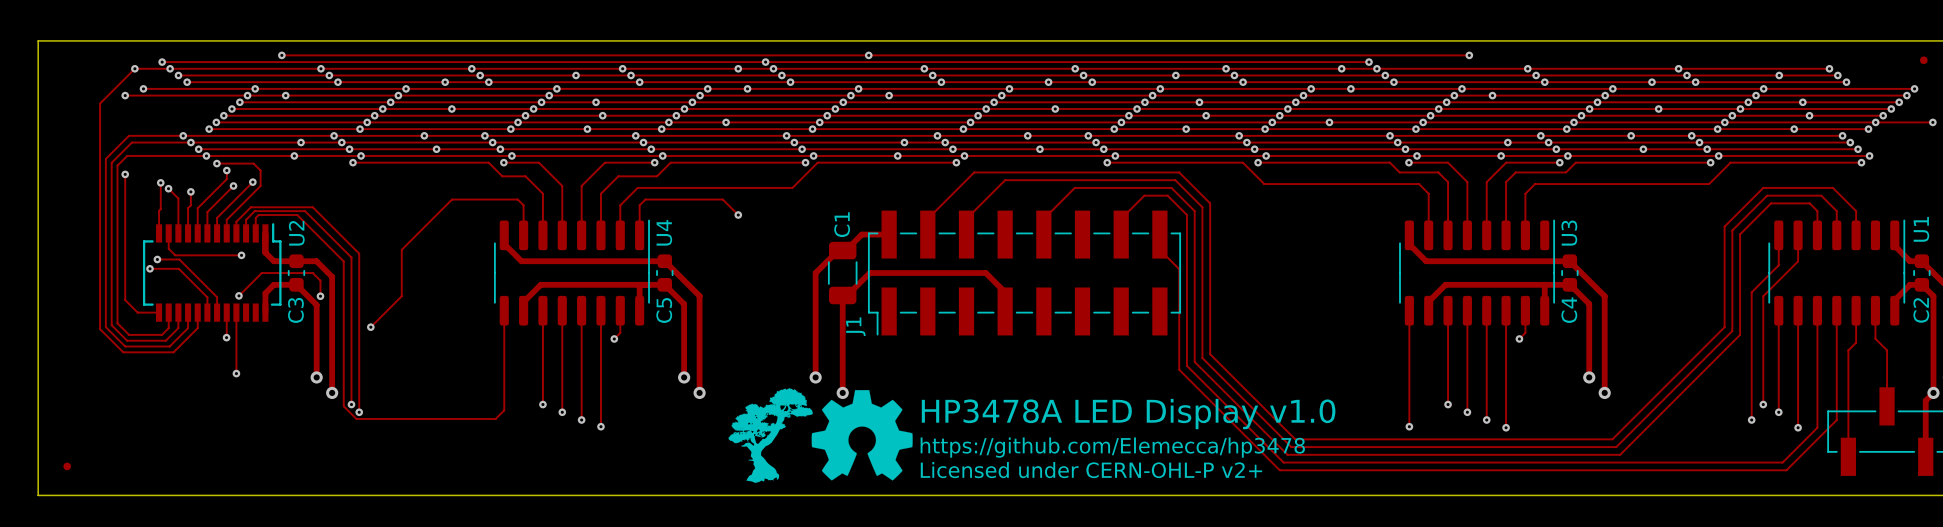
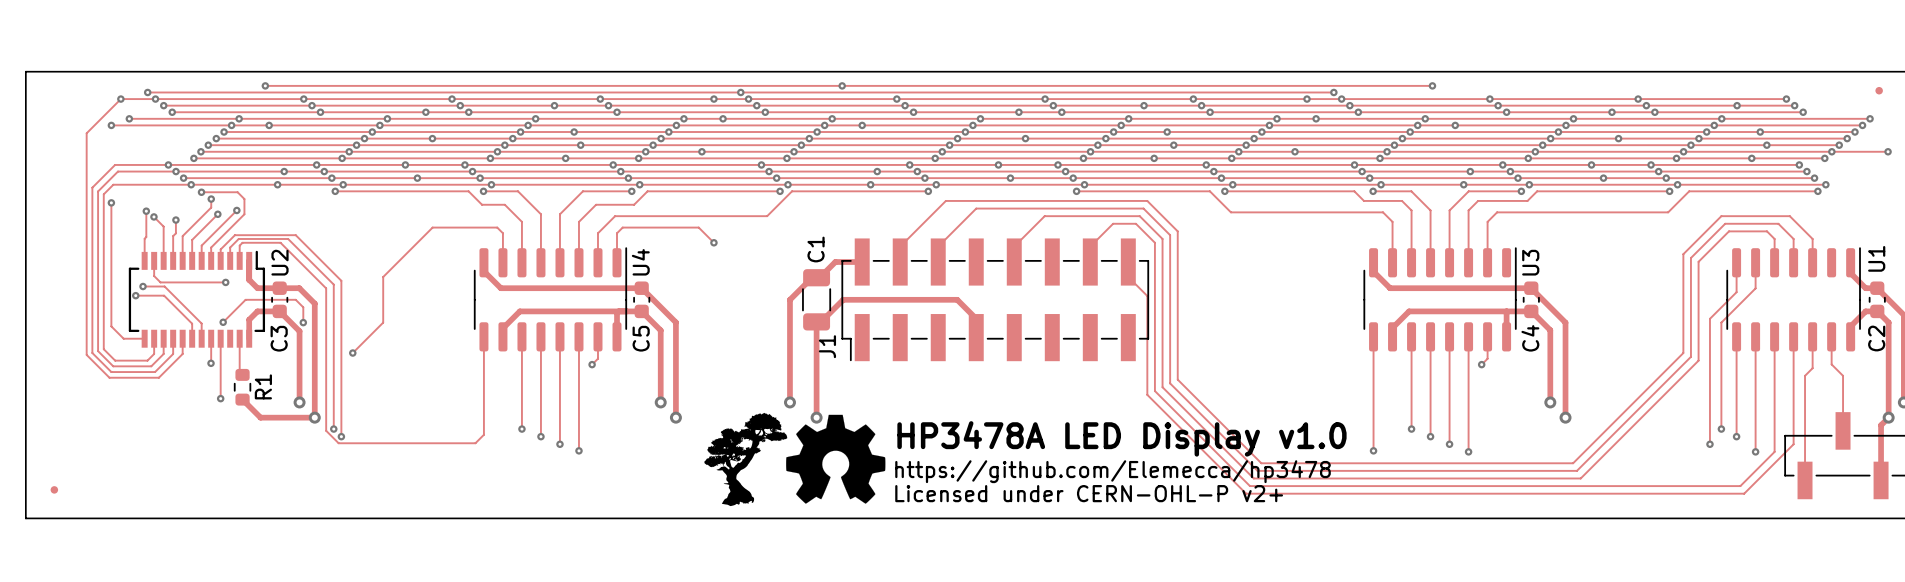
track: none -> (239, 338) (239, 372) (242, 374)
R1: none -> (242, 387)
track: none -> (242, 399) (260, 417) (314, 417)

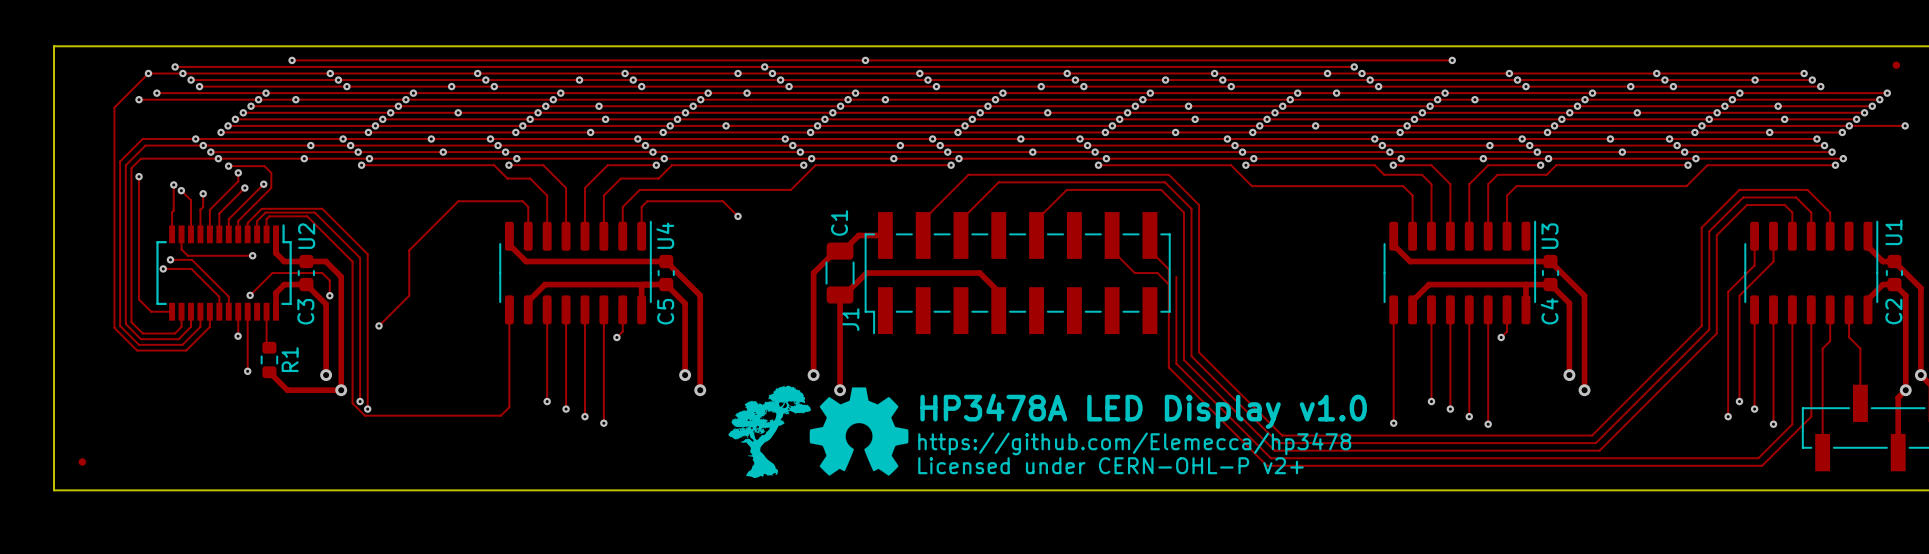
track: (1090, 246) (1113, 223) (1135, 223) (1154, 242) (1154, 303) -> none
track: none -> (1112, 235) (1112, 250) (1134, 273) (1157, 273) (1168, 284)

